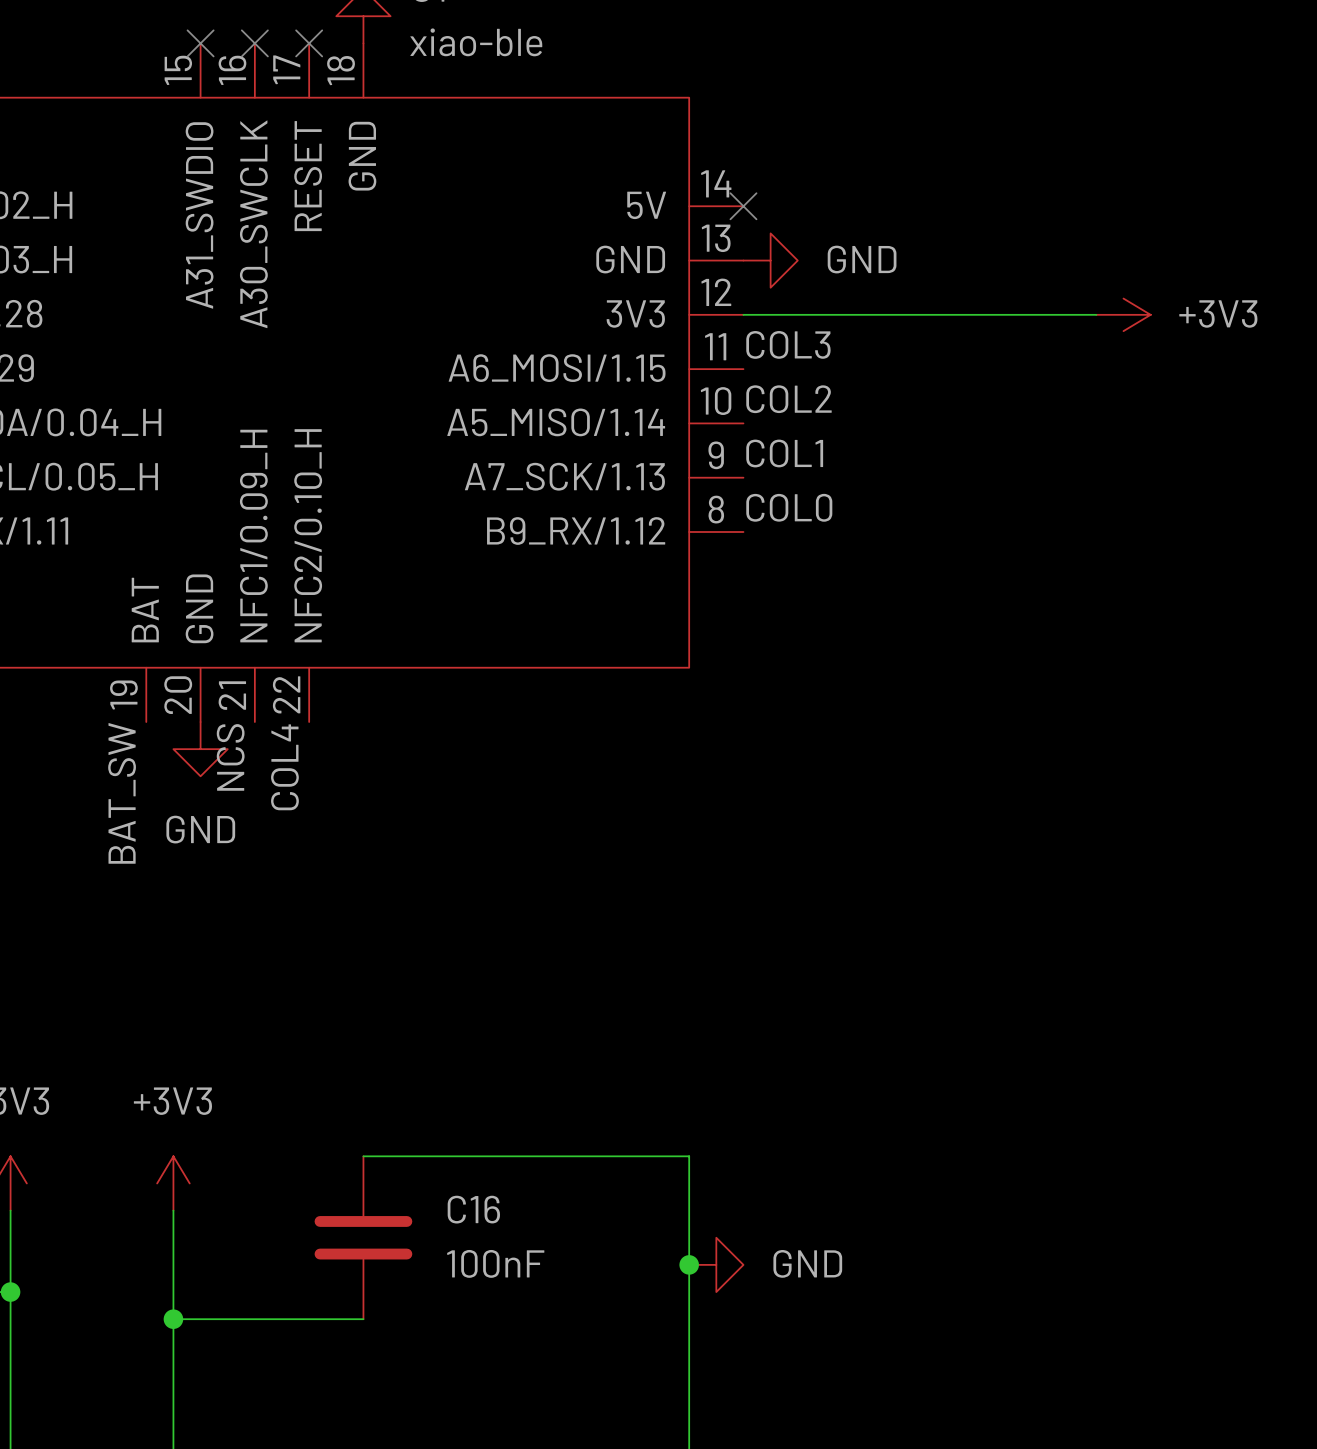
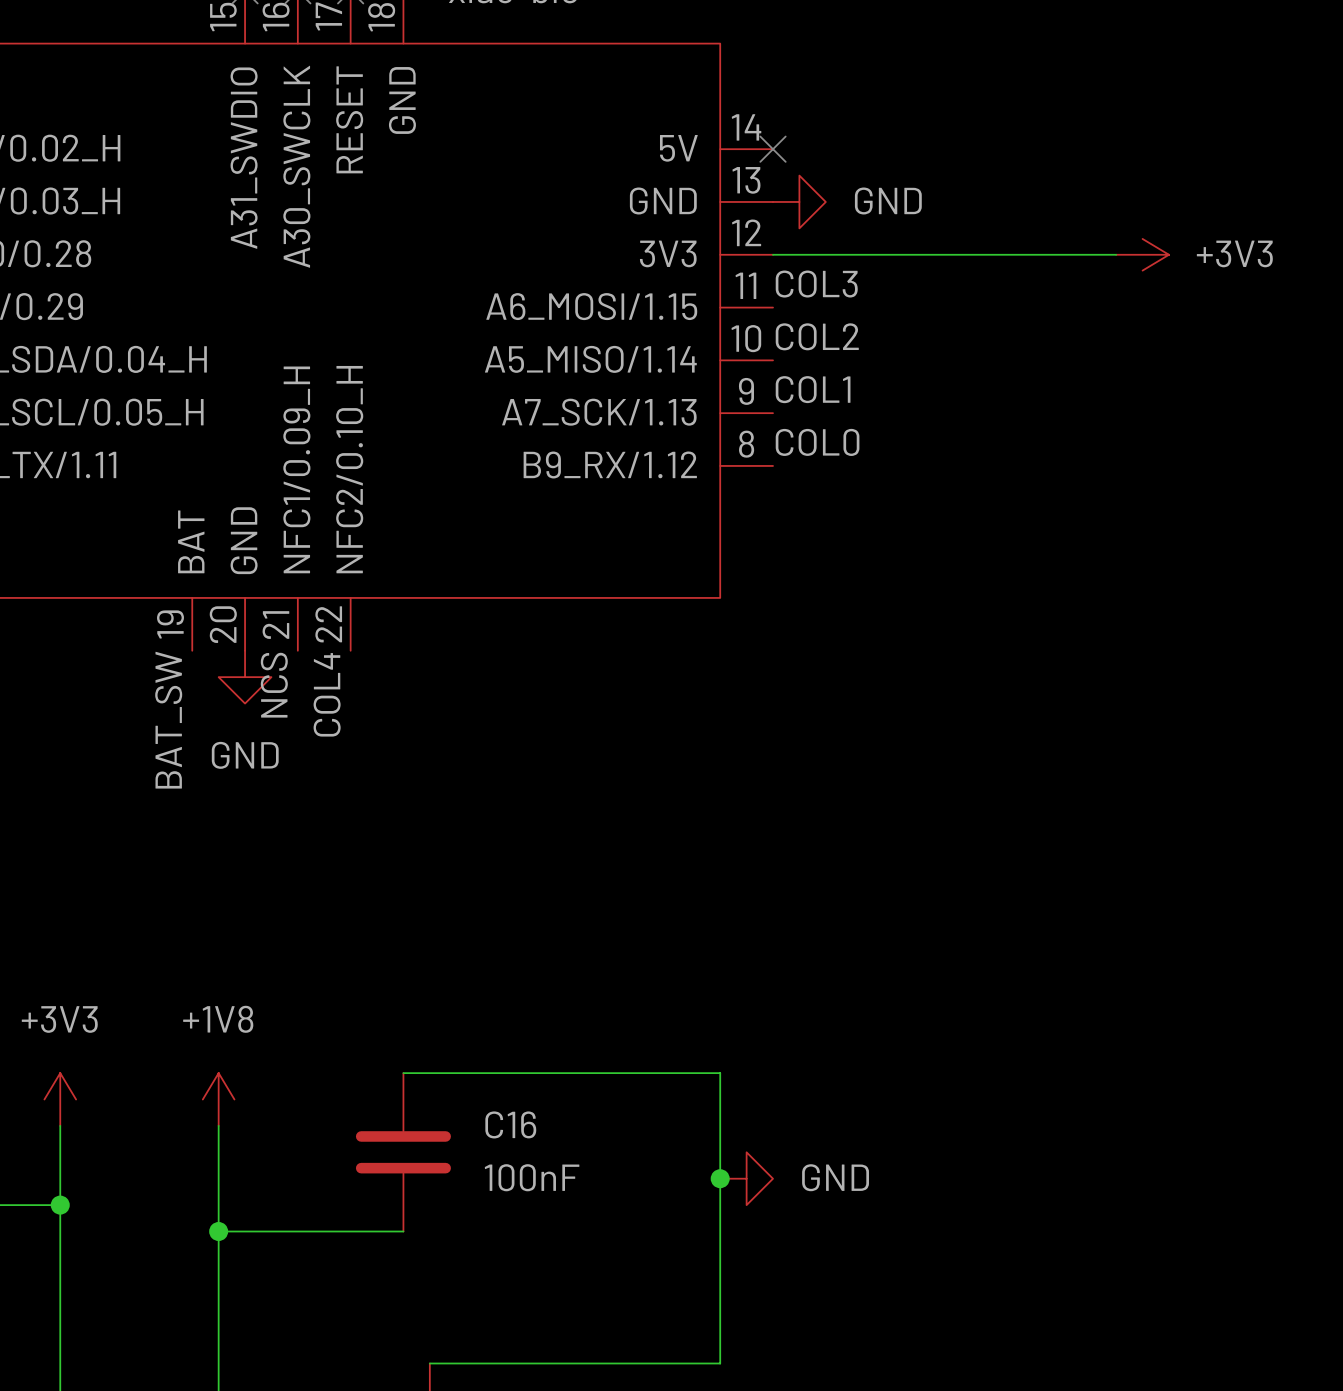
power symbol: +3V3 (173, 1183) -> +1V8 (218, 1099)

